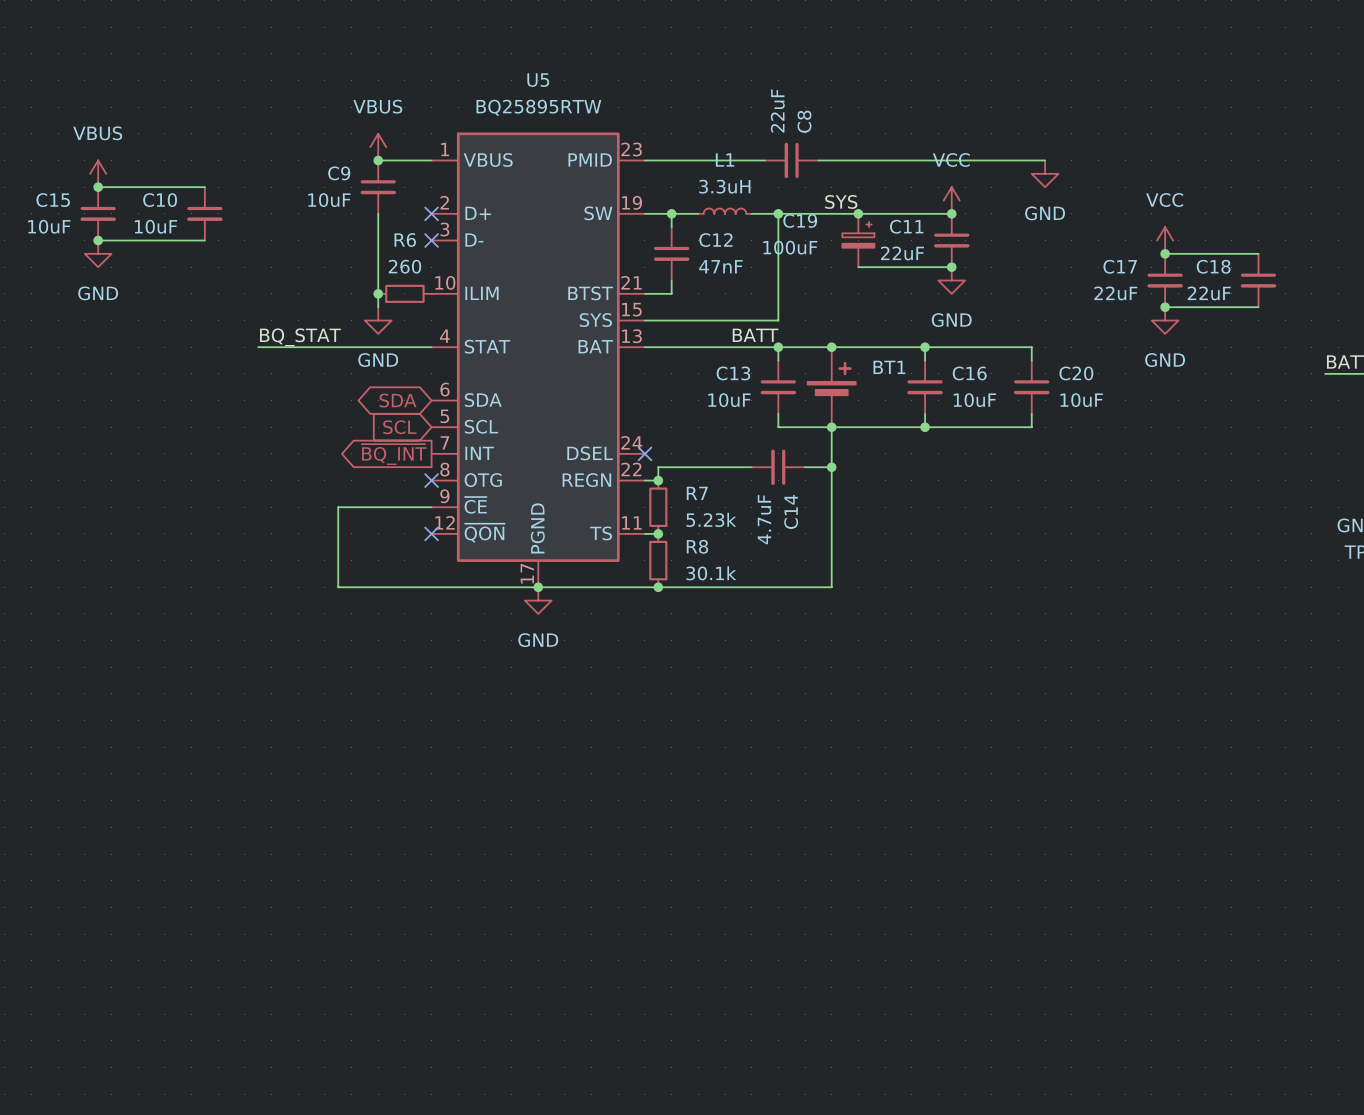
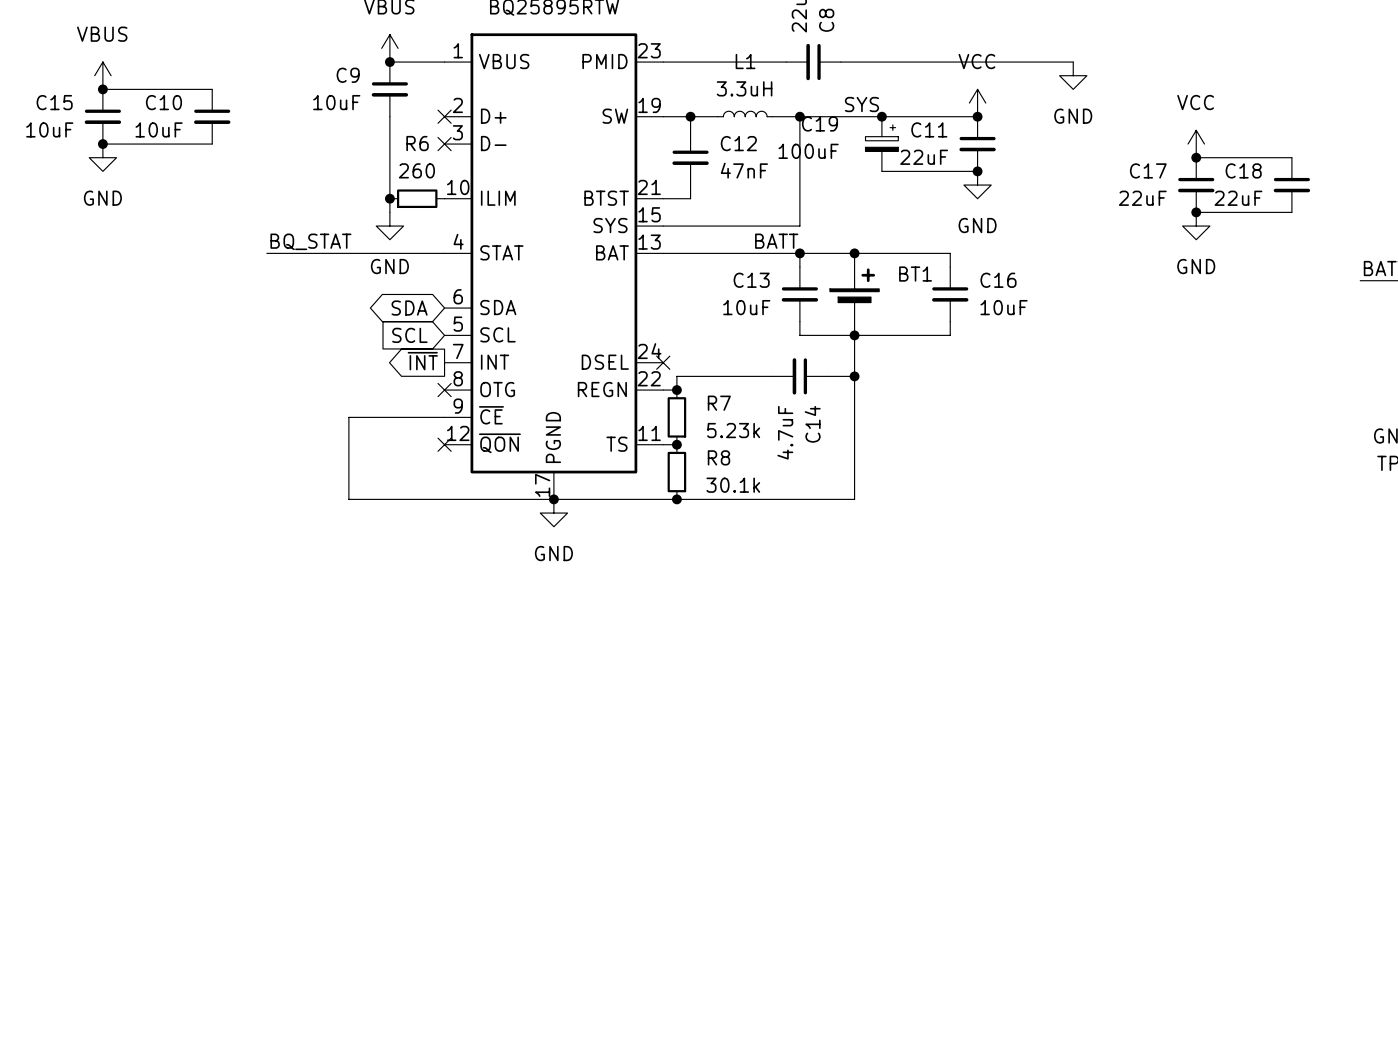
wire: (925, 347) (1031, 347) (1031, 360) -> none
junction: (925, 347) -> none
C20: 10uF (1031, 387) -> none
wire: (1031, 413) (1031, 427) (925, 427) -> none
junction: (925, 427) -> none
global label: ~{BQ_INT} (394, 454) -> ~{INT} (422, 361)

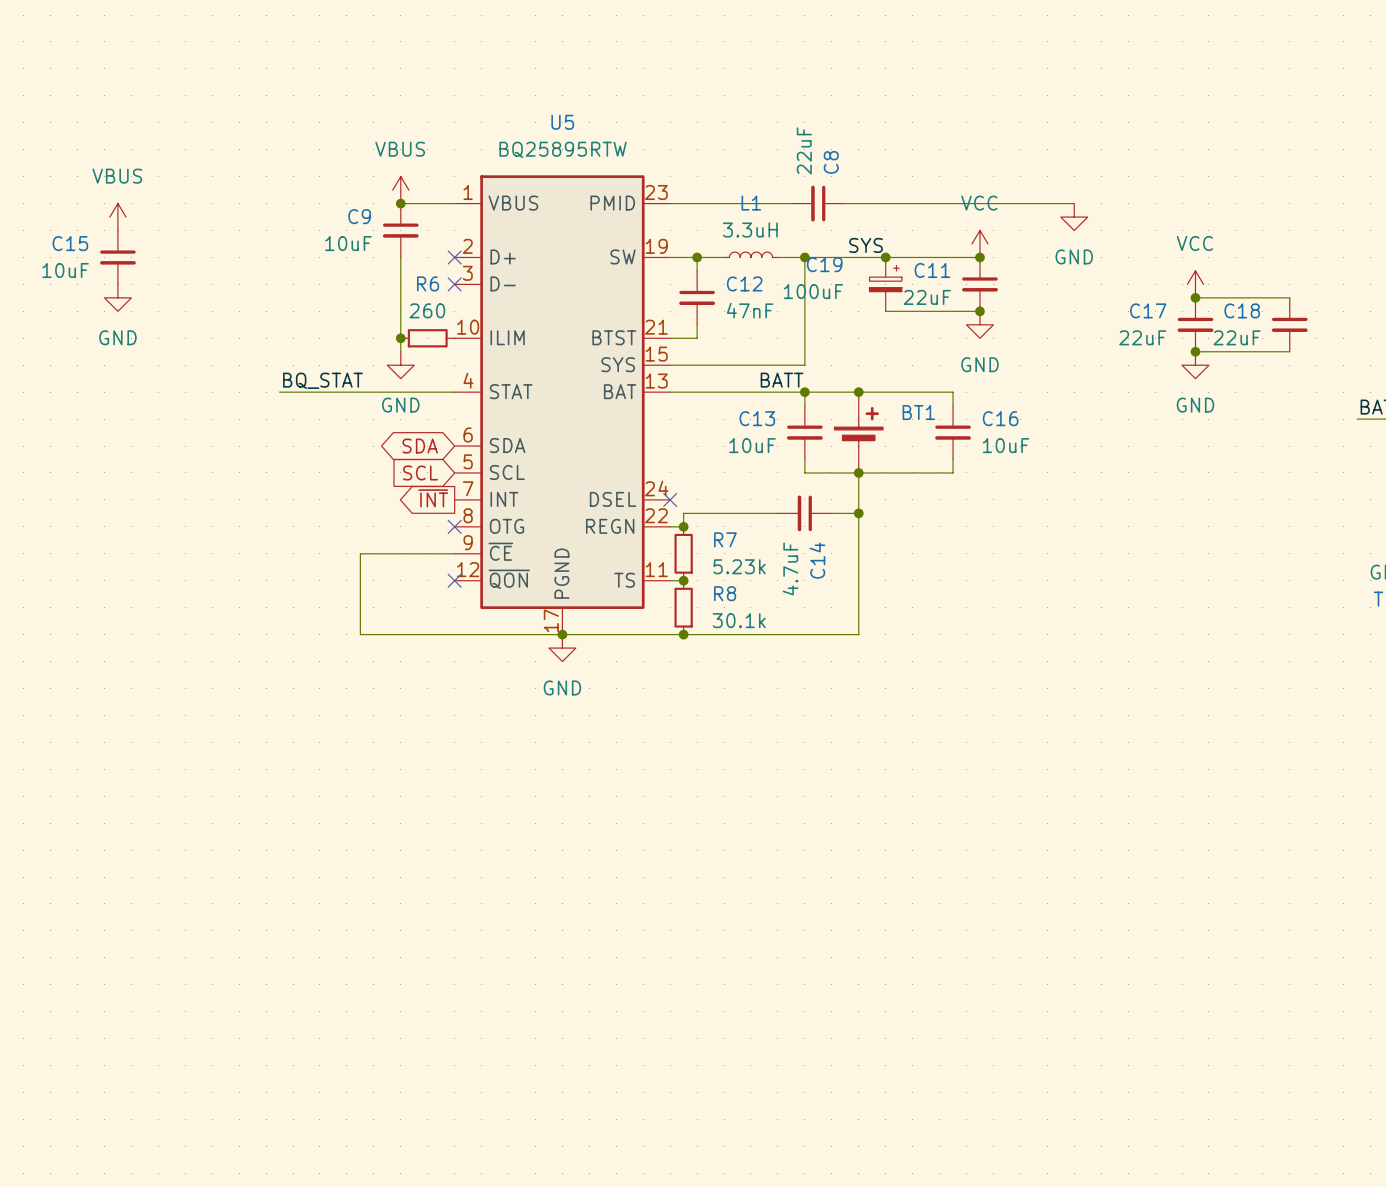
wire: (102, 89) (212, 89) -> none
junction: (102, 89) -> none
C10: 10uF (212, 116) -> none
wire: (102, 144) (212, 144) -> none
junction: (102, 144) -> none

